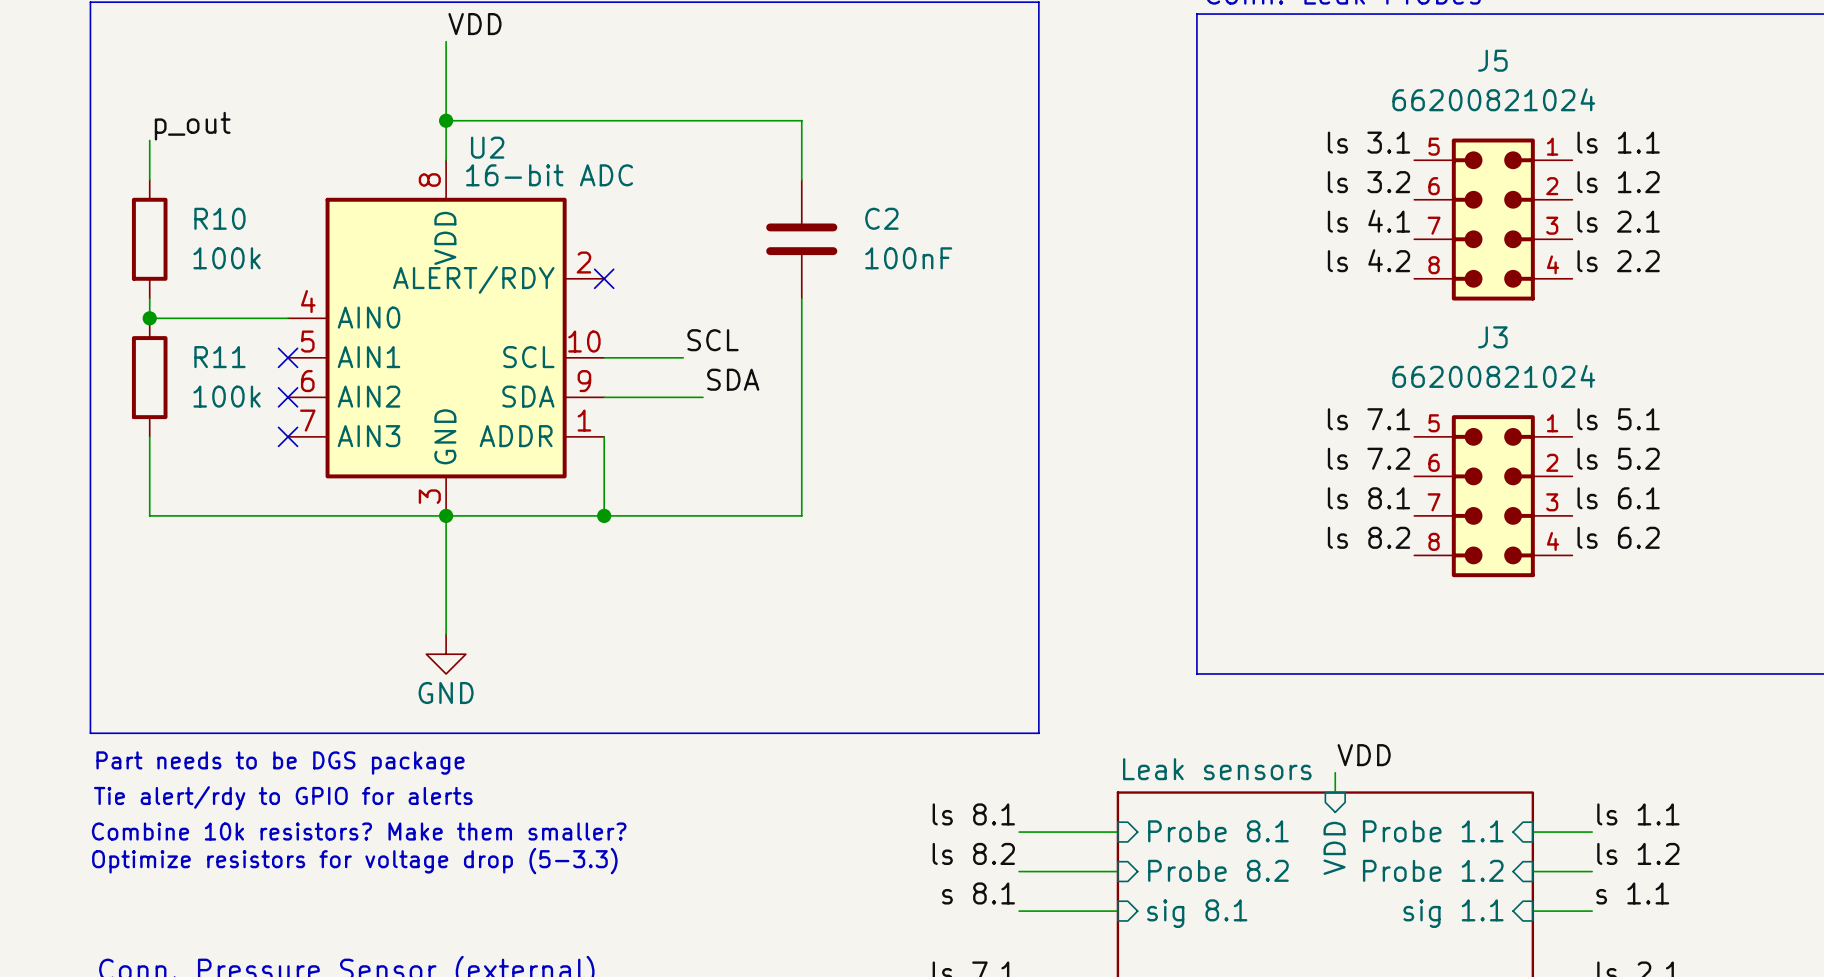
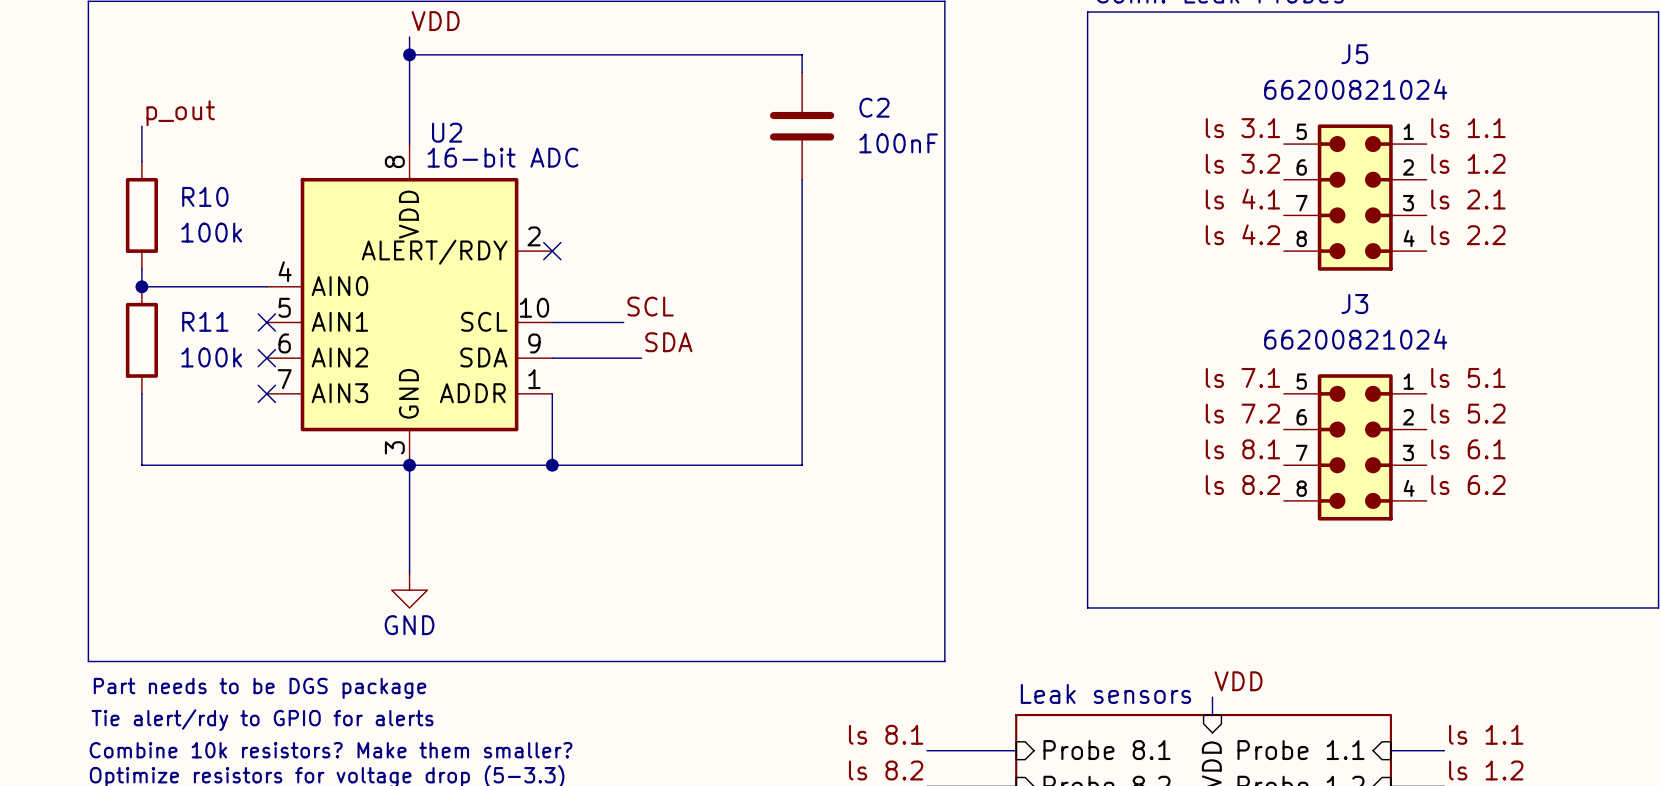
wire: none -> (409, 54) (802, 54) (802, 72)
wire: (446, 120) (801, 120) (801, 180) -> none
junction position: (446, 120) -> (409, 54)
C2 position: (801, 239) -> (802, 126)
wire: (801, 298) (801, 515) -> (802, 179) (802, 465) (730, 465)

